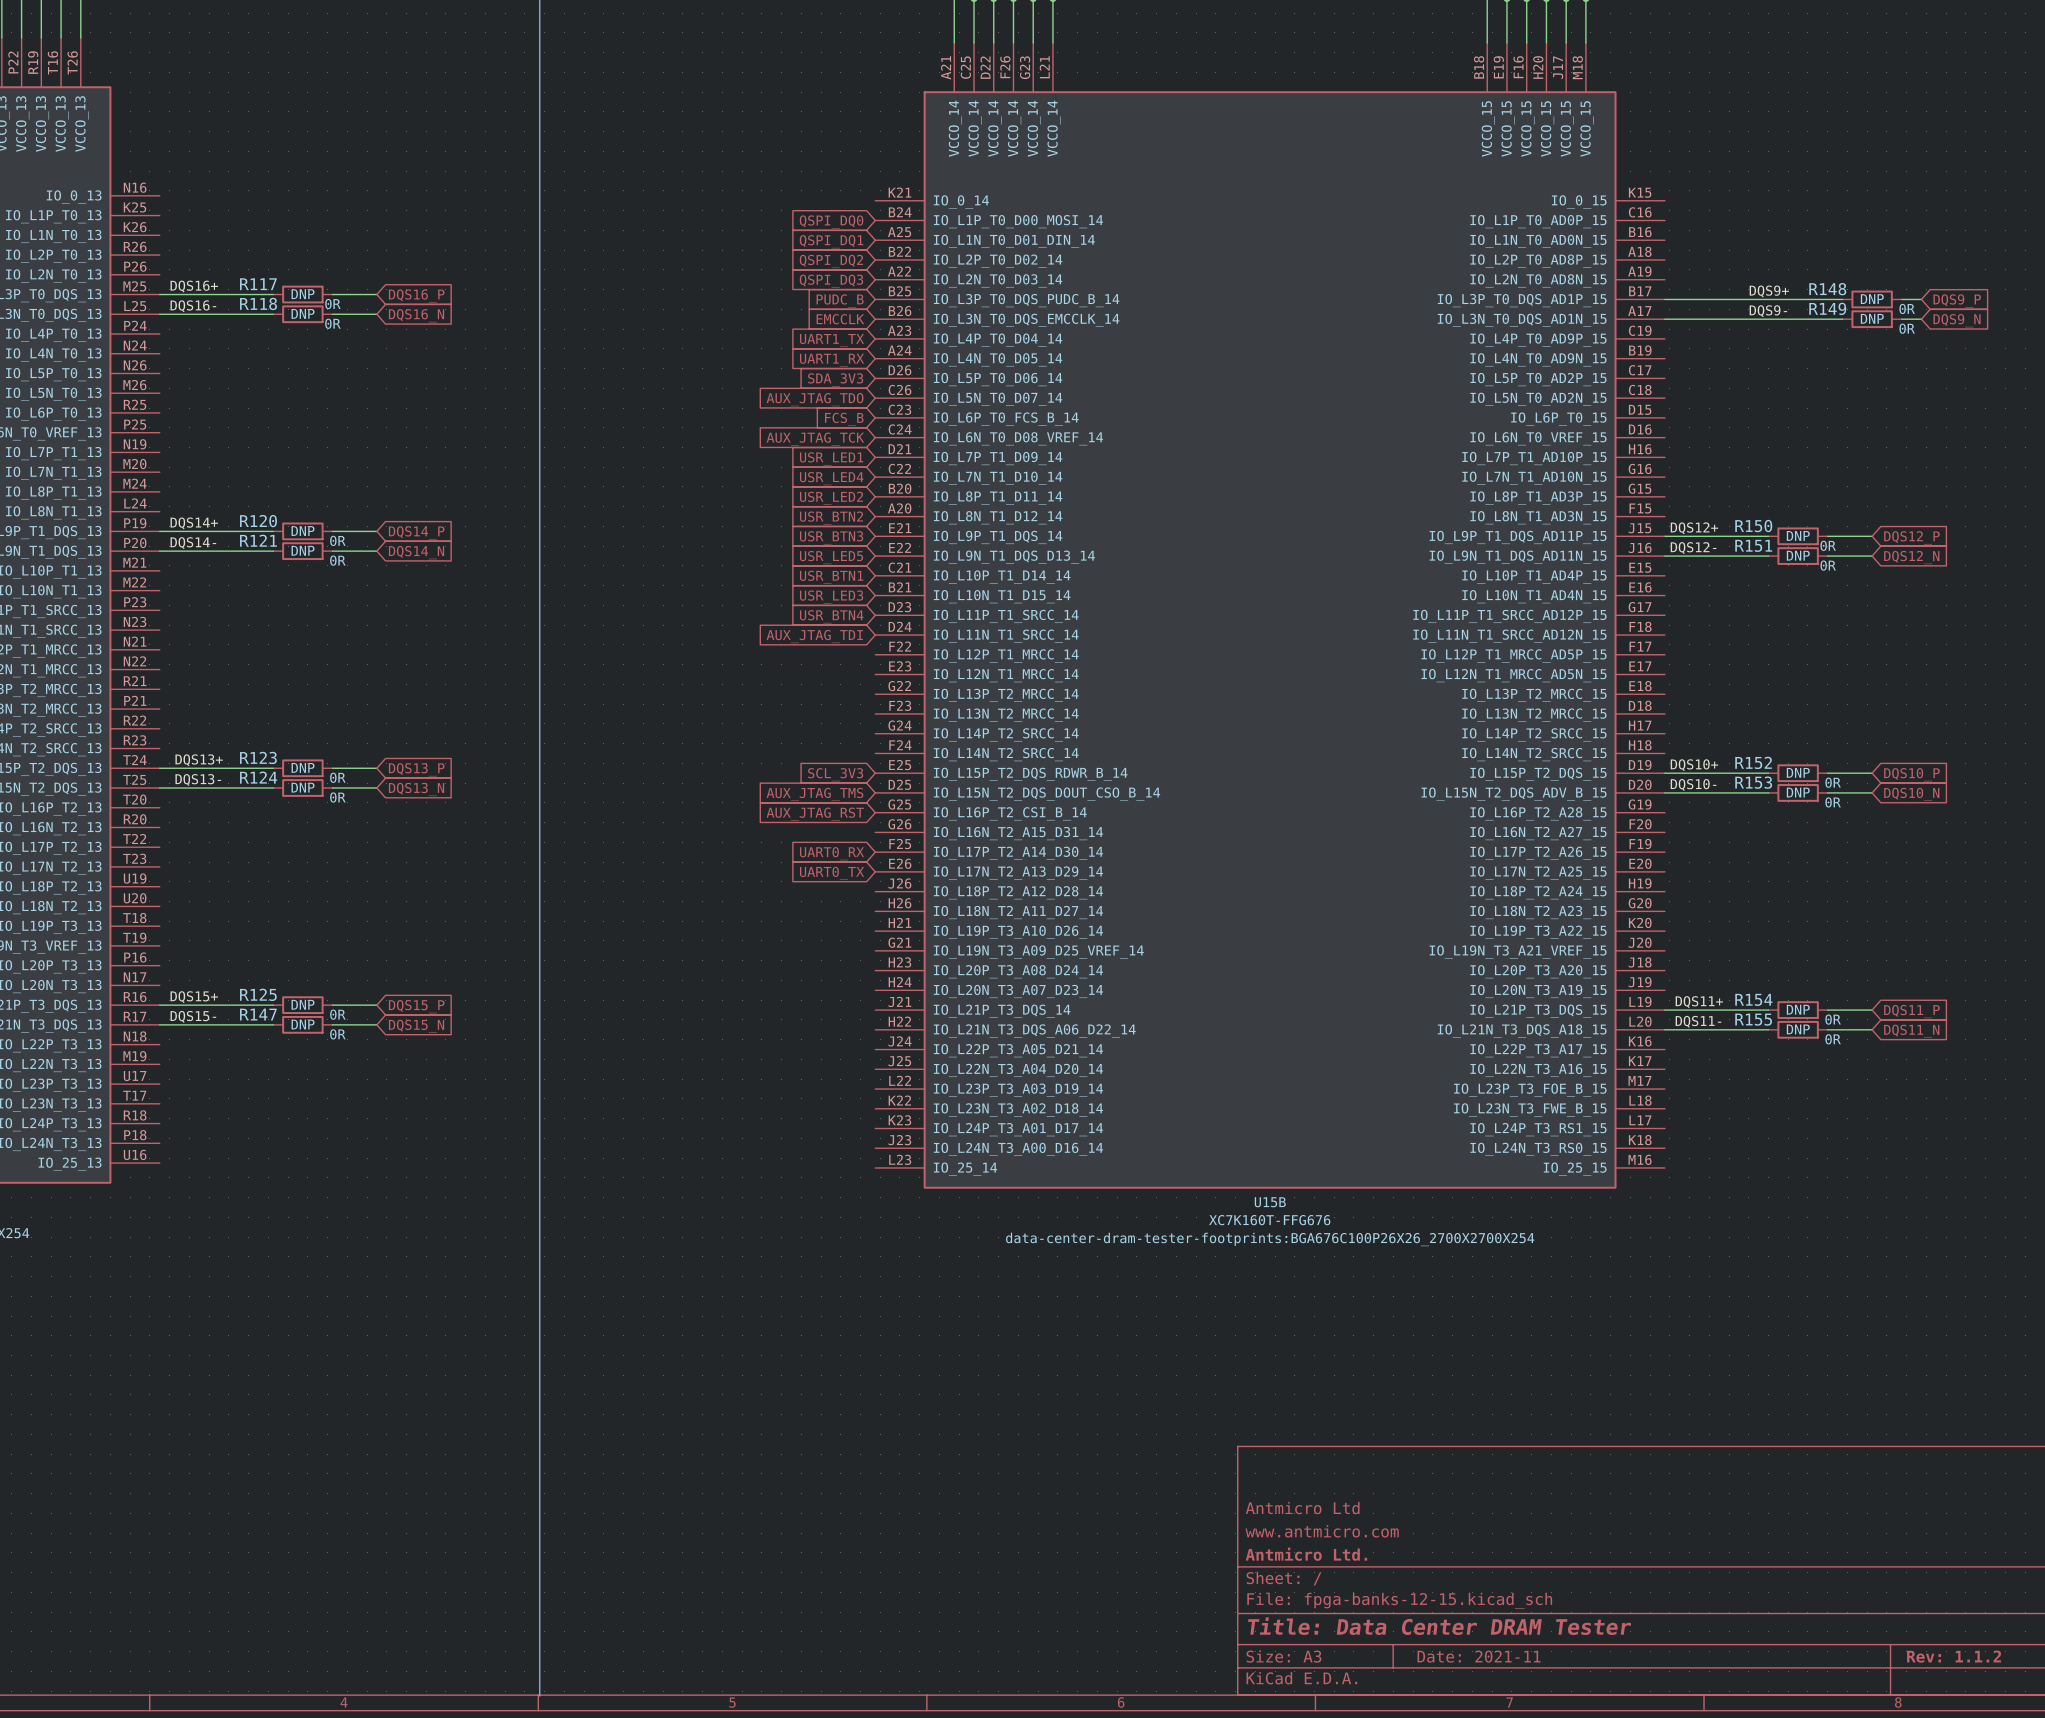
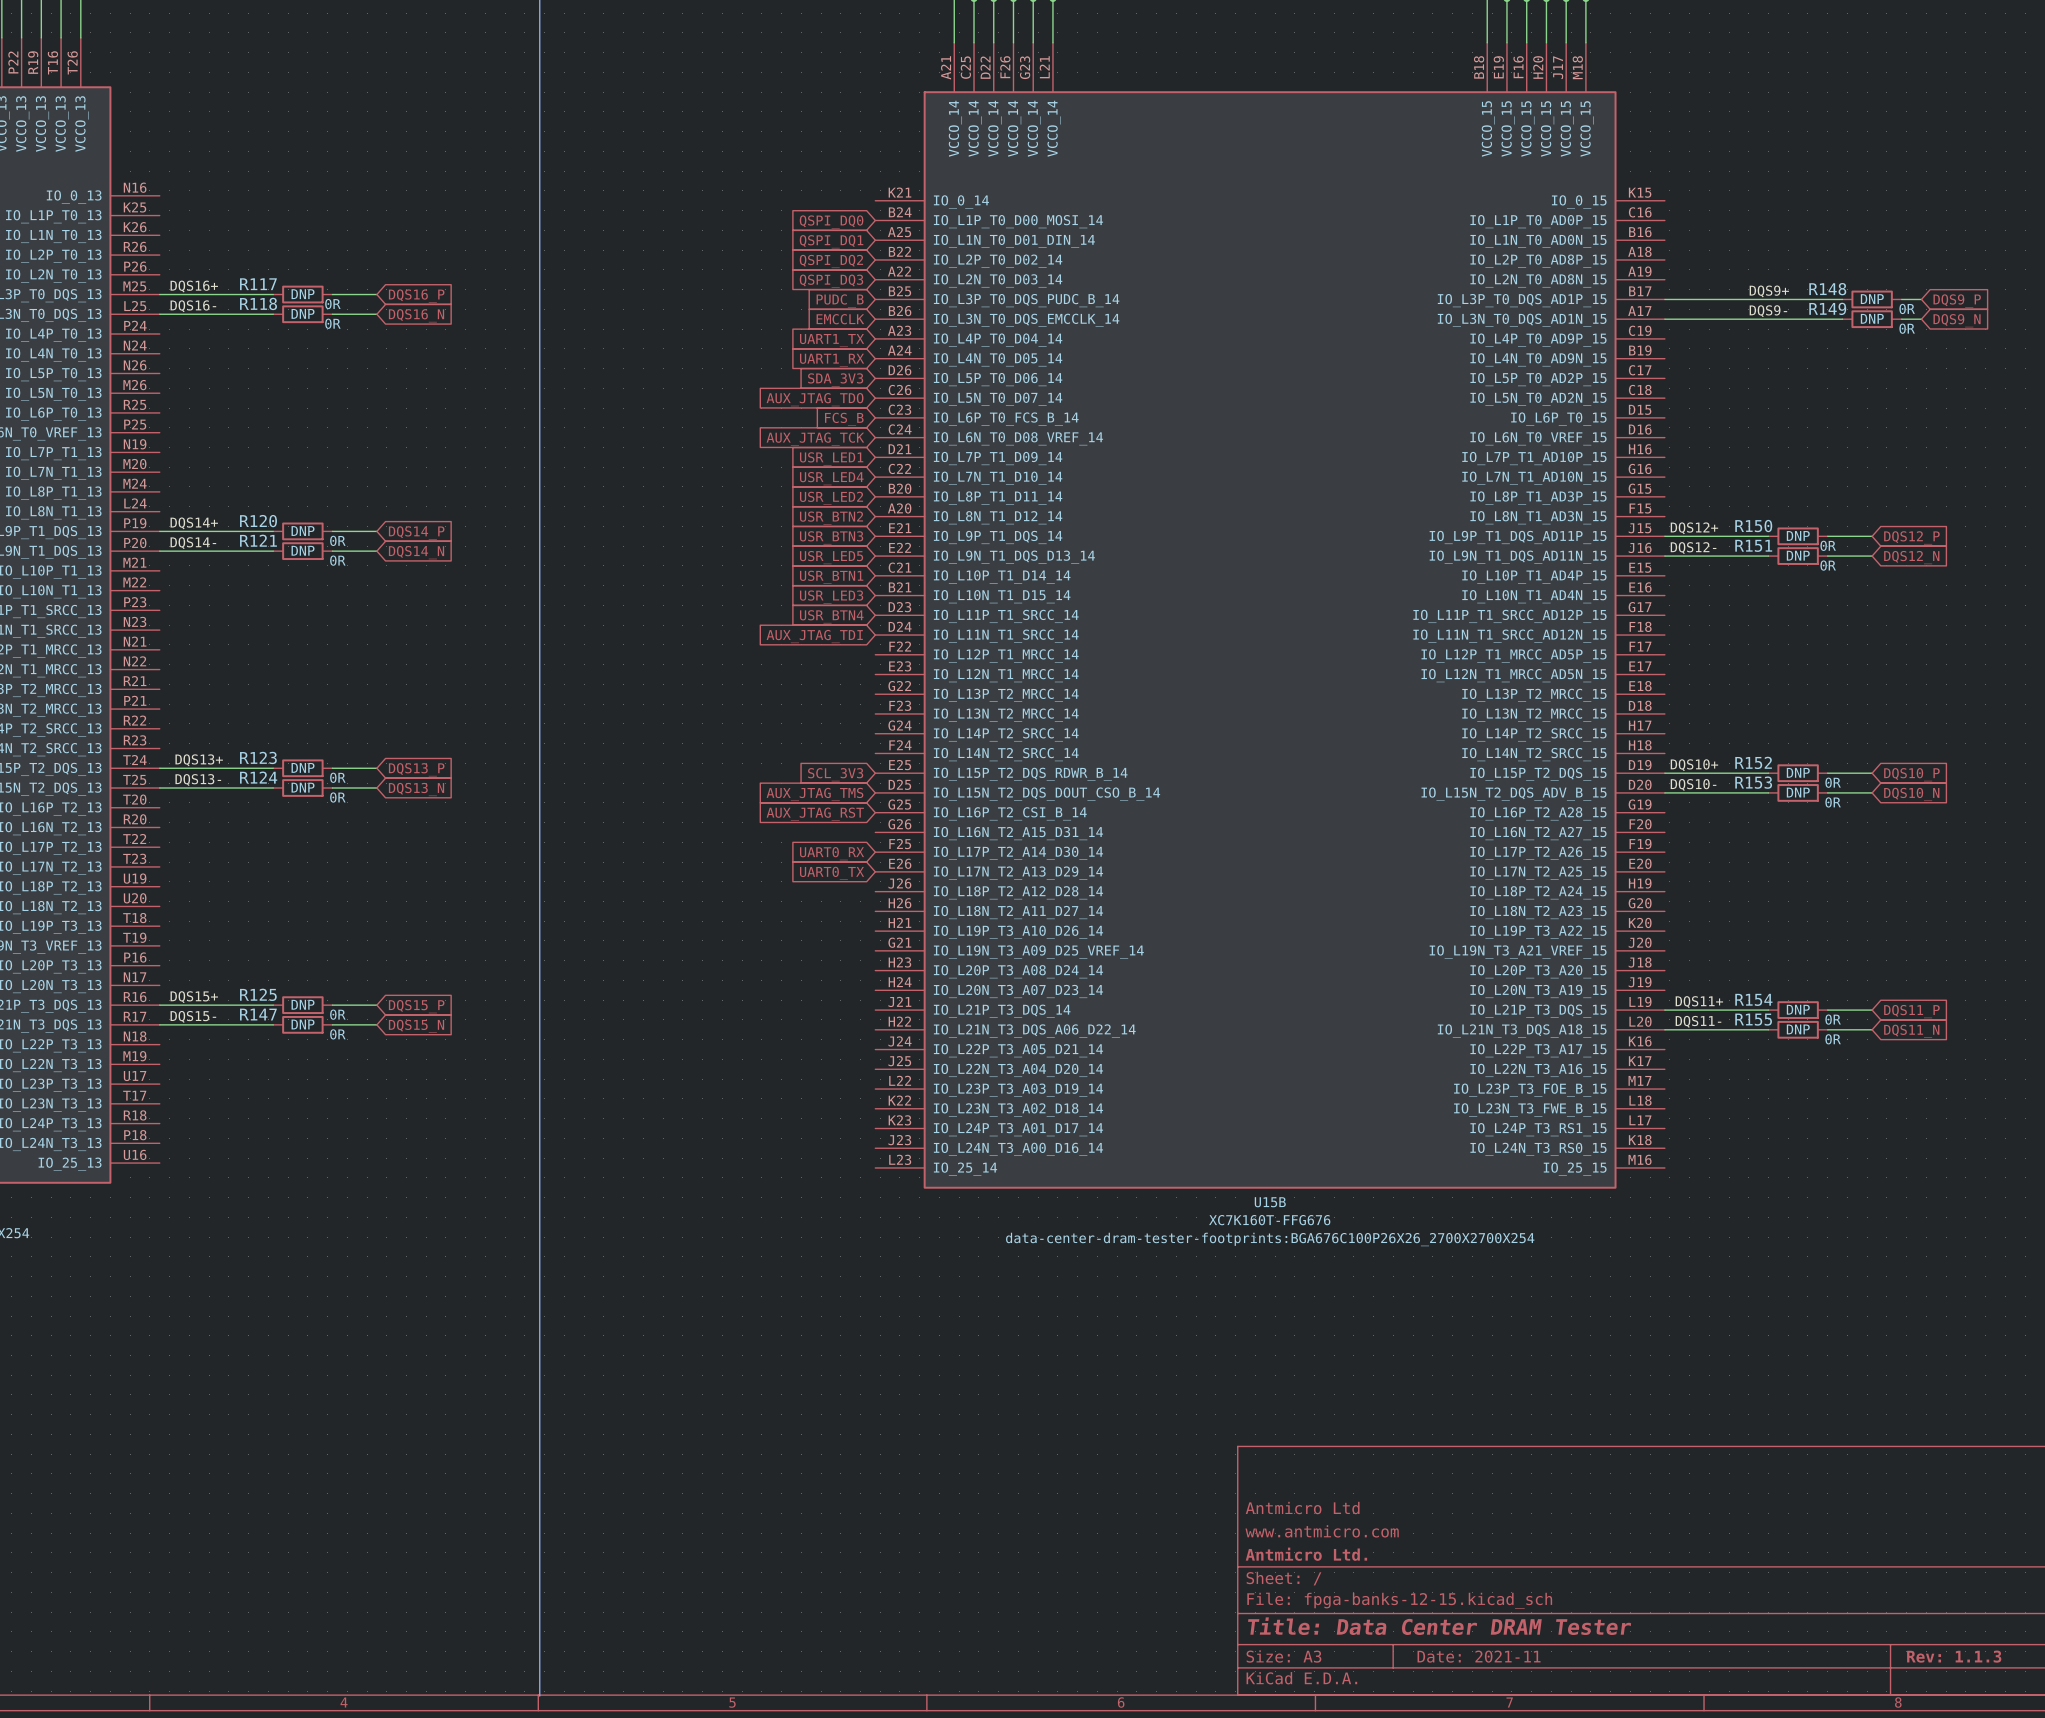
title block: Rev: 1.1.2 (1954, 1656) -> Rev: 1.1.3 (1954, 1656)

